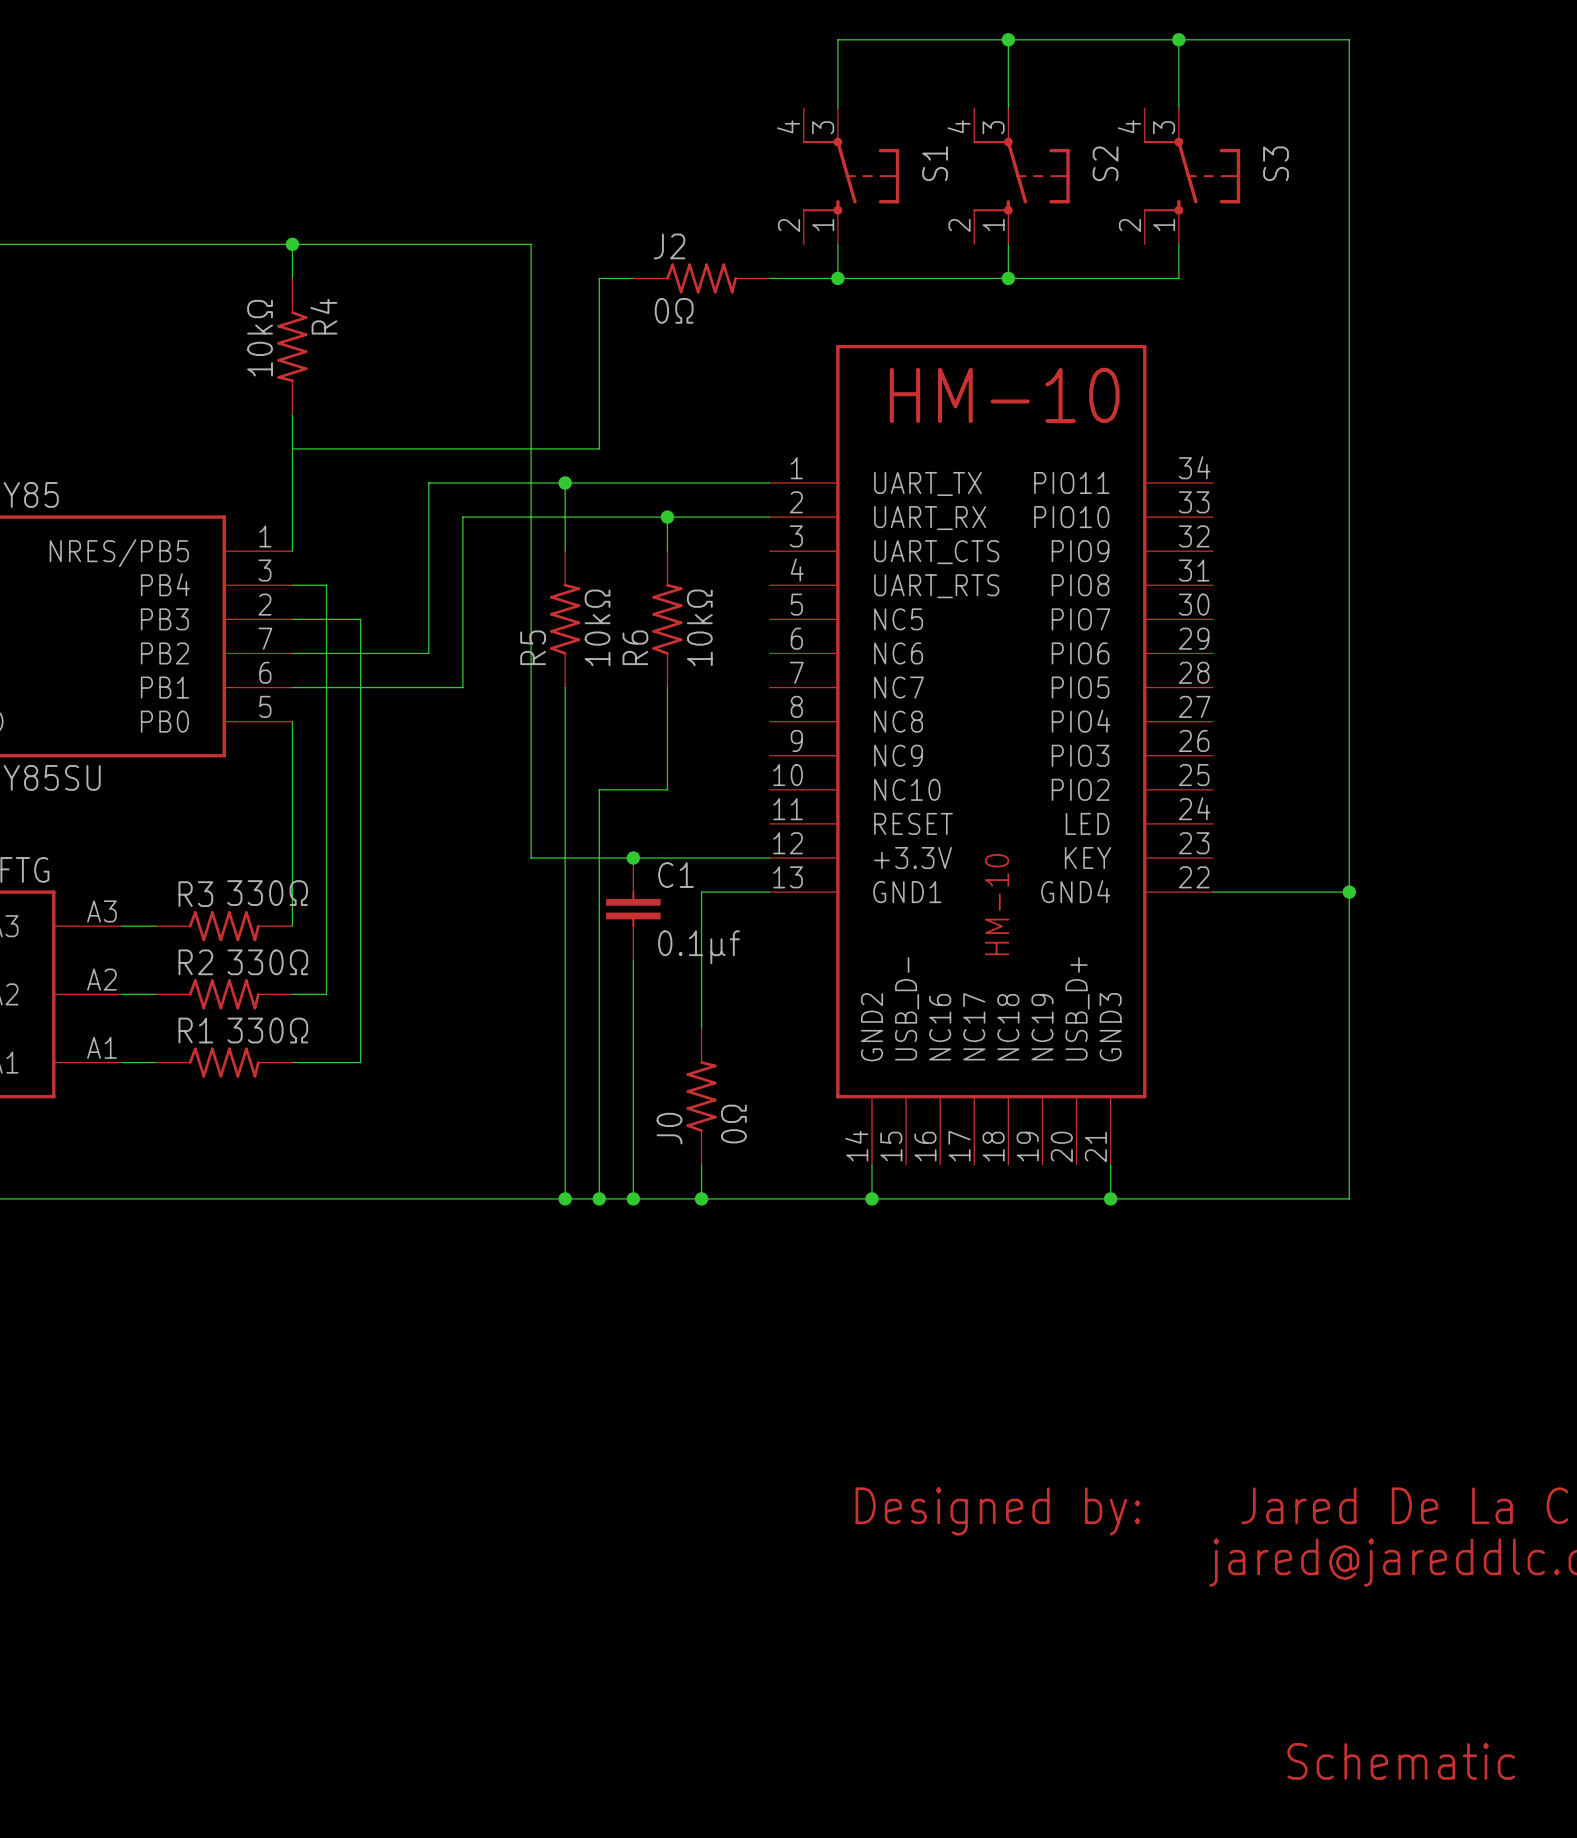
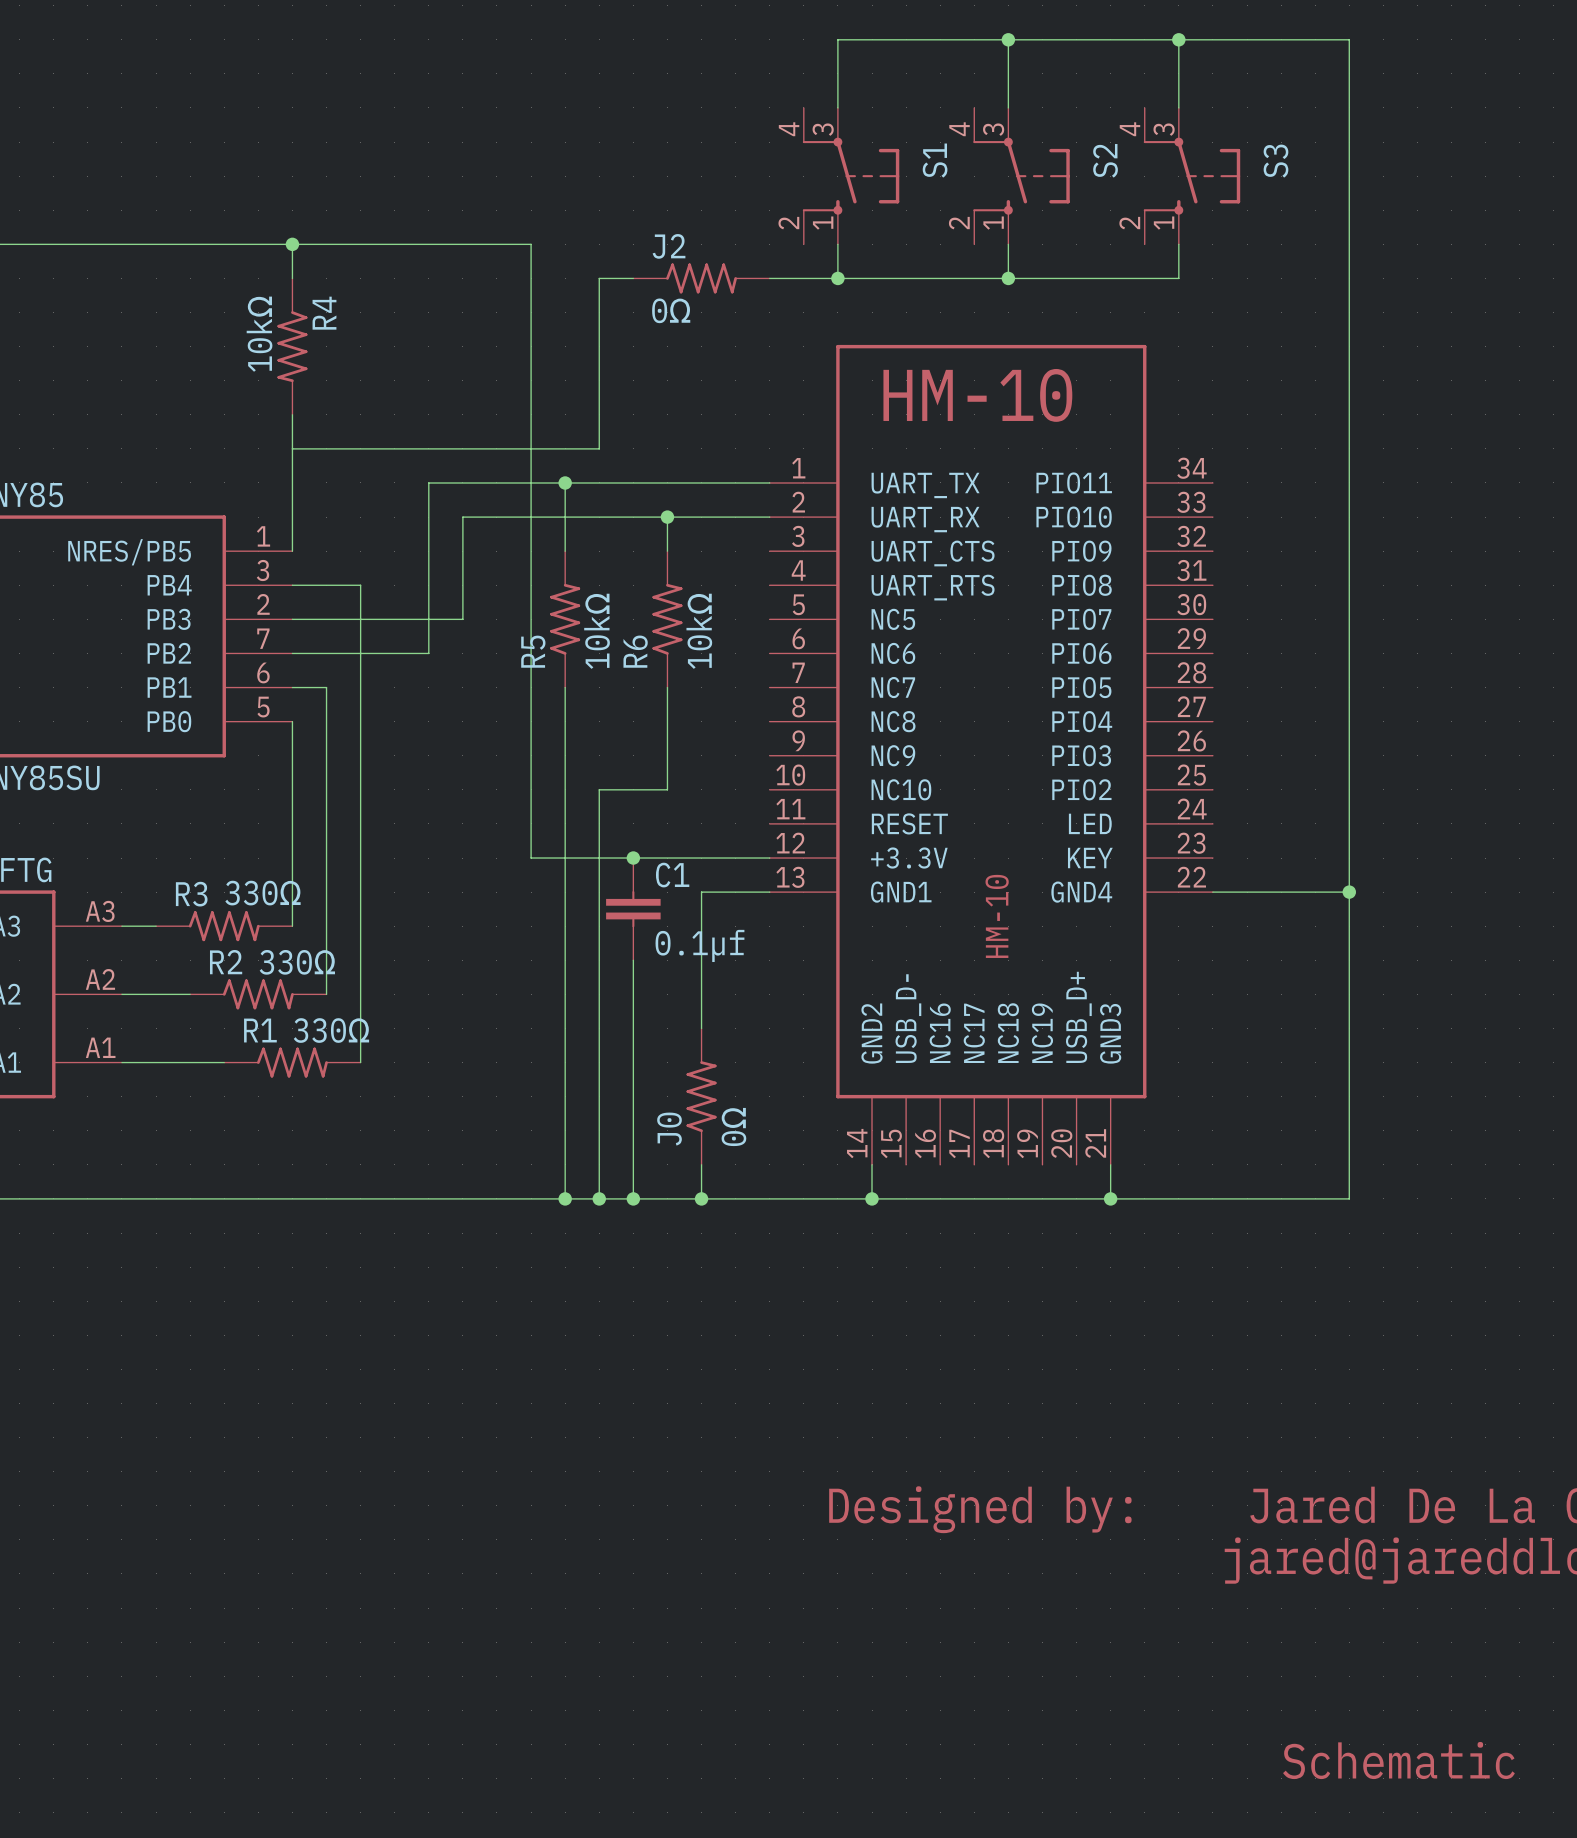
wire: (326, 585) (326, 687) (462, 687) (462, 619) -> (326, 585) (360, 585) (360, 619) (462, 619)
R2 position: (224, 994) -> (258, 994)
R1 position: (224, 1062) -> (292, 1062)

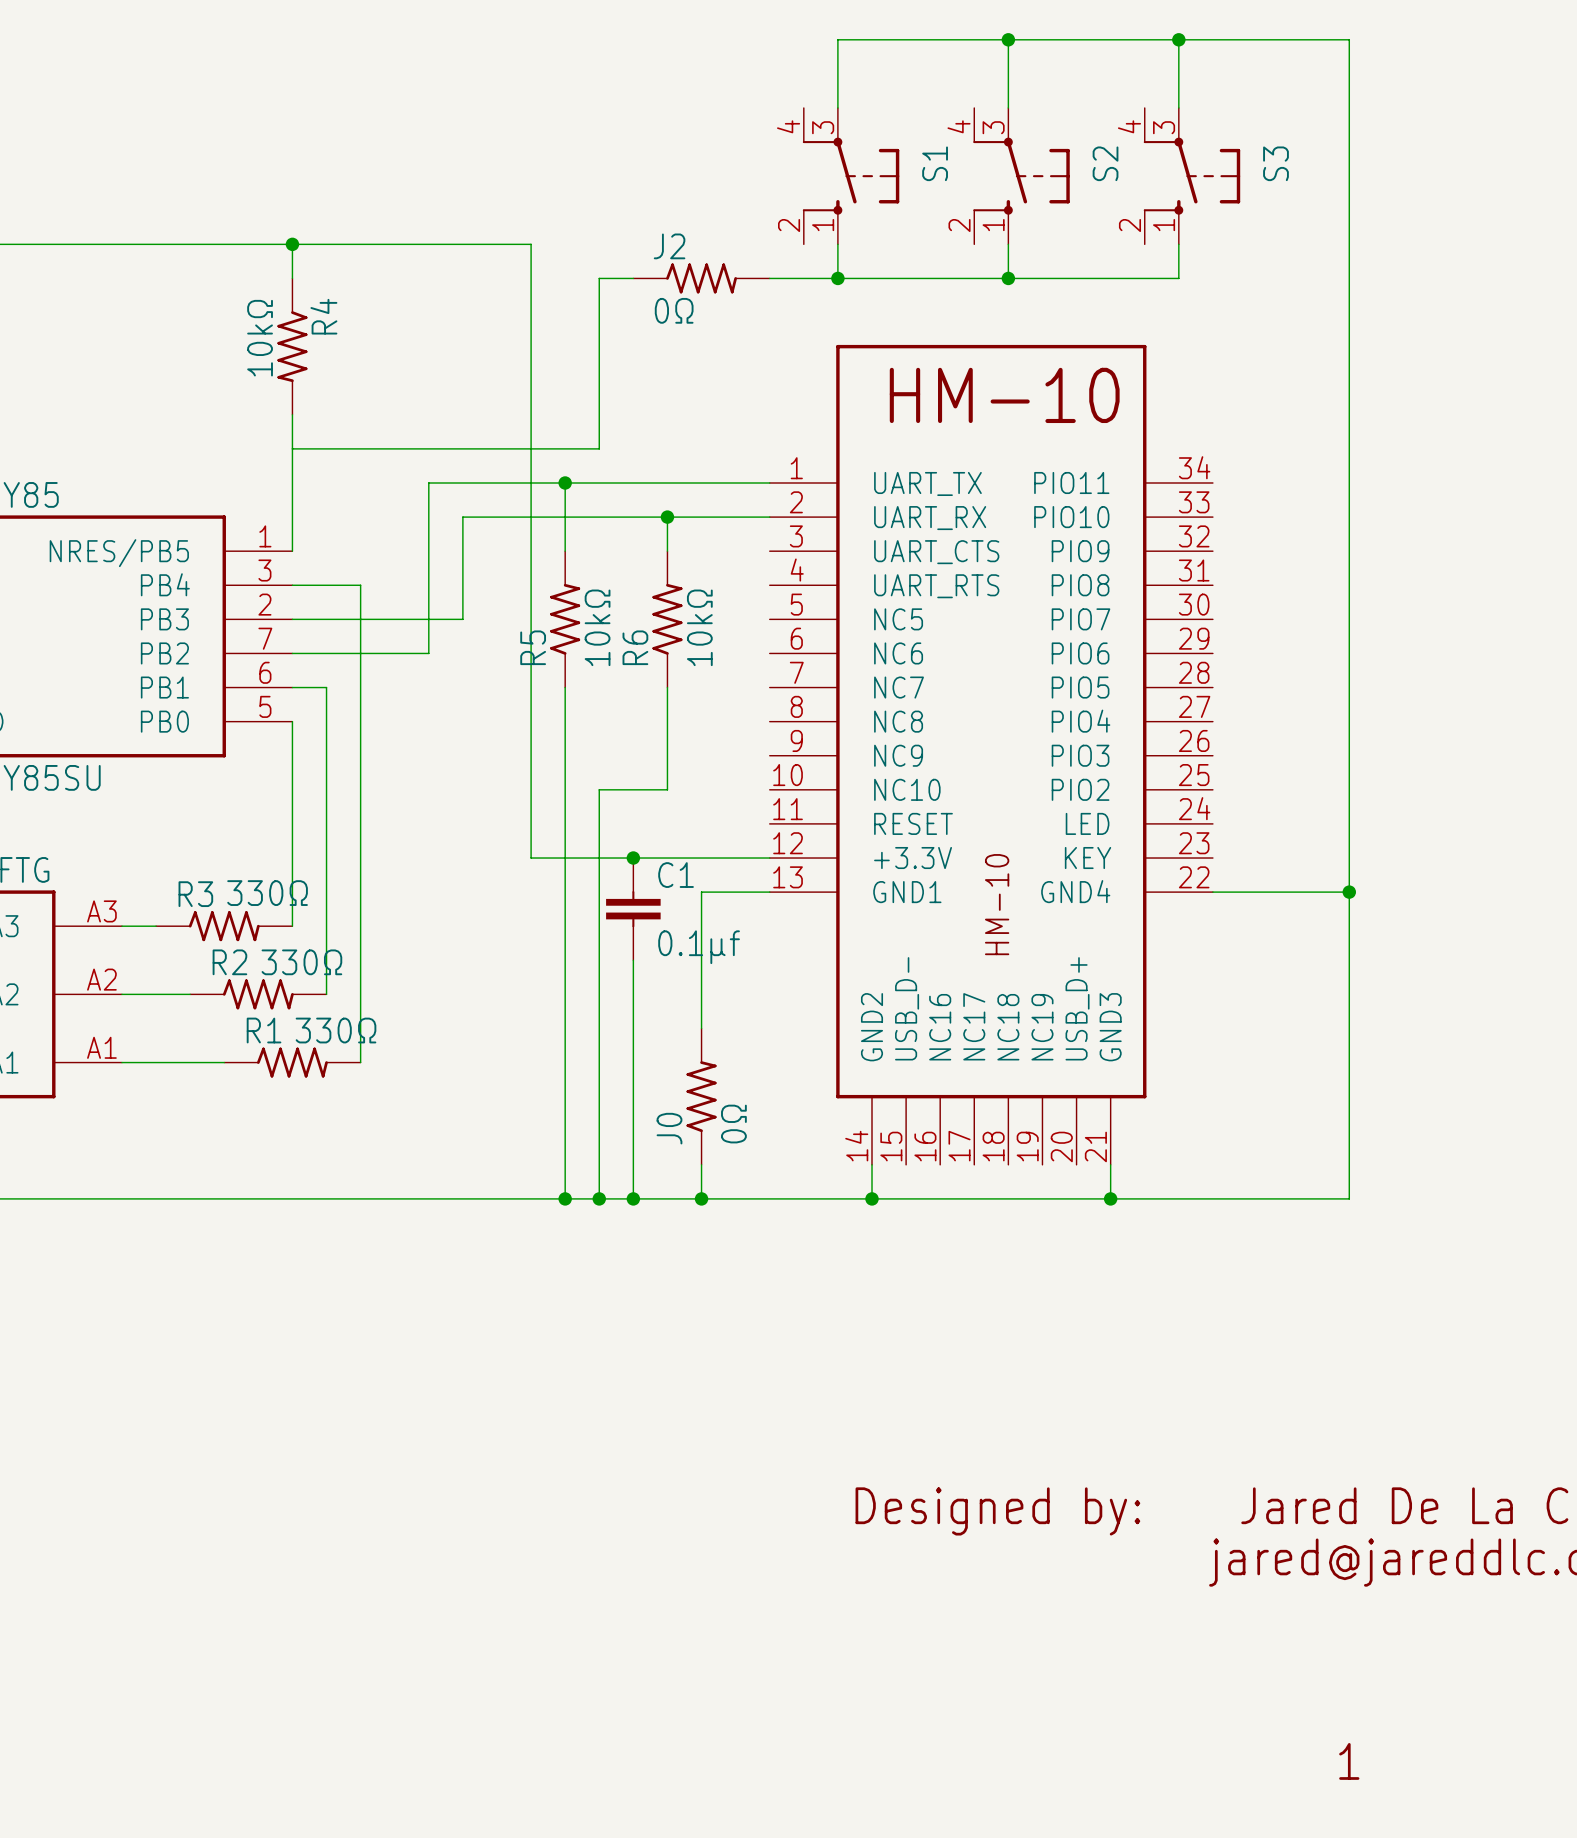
text: Schematic (1398, 1760) -> none
text: none -> 1 (1349, 1761)

